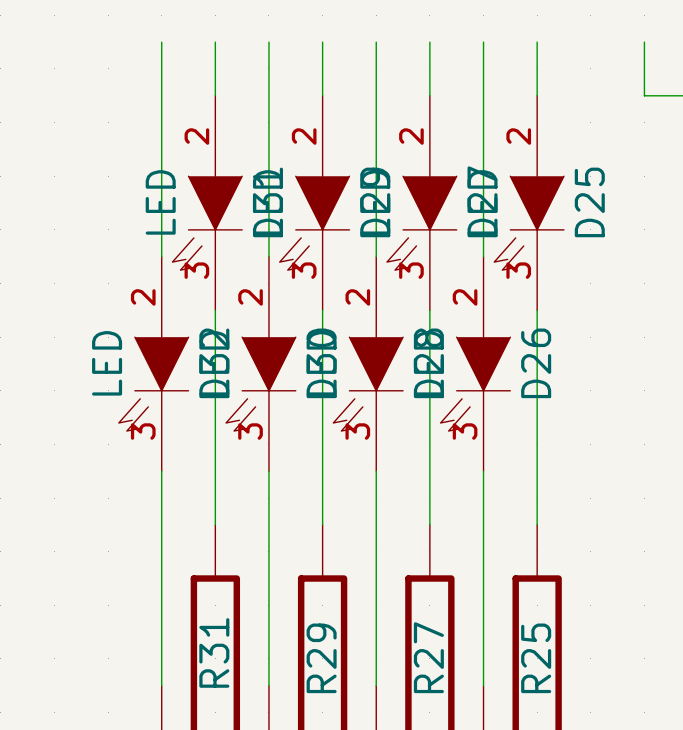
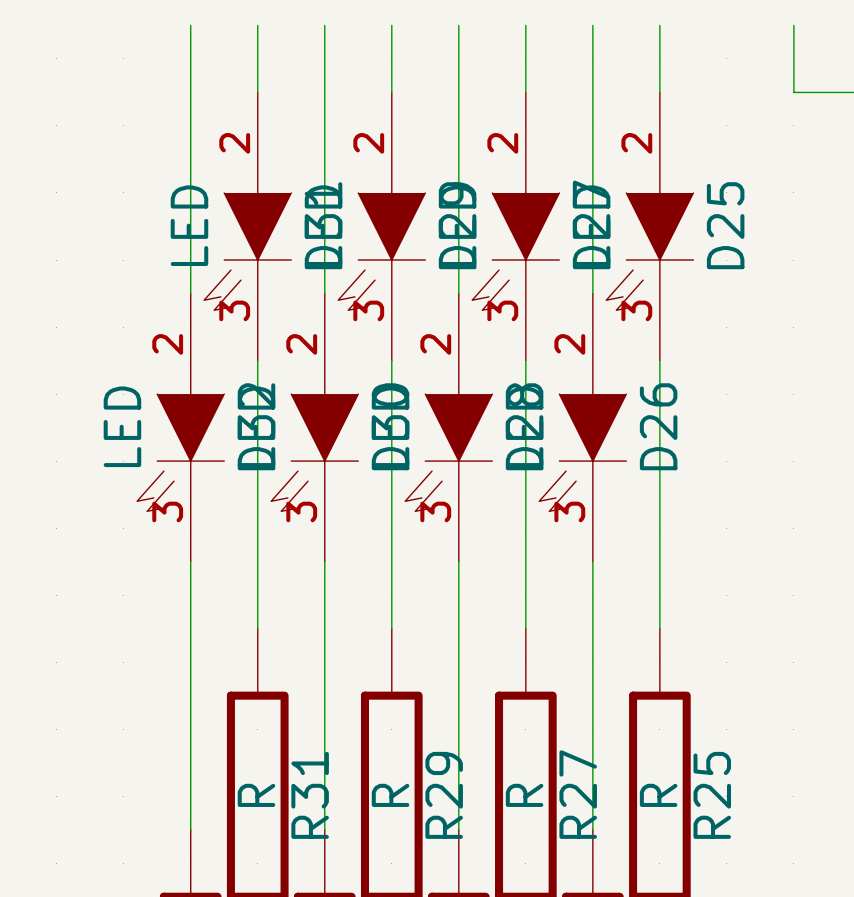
R31 name position: R31 (214, 652) -> R31 (310, 795)
R27 name position: R27 (428, 657) -> R27 (578, 794)
R31 value: none -> R (256, 795)
R29 name position: R29 (321, 658) -> R29 (444, 795)
R29 value: none -> R (390, 795)
R27 value: none -> R (524, 795)
R25 name position: R25 (536, 658) -> R25 (712, 795)
R25 value: none -> R (658, 795)

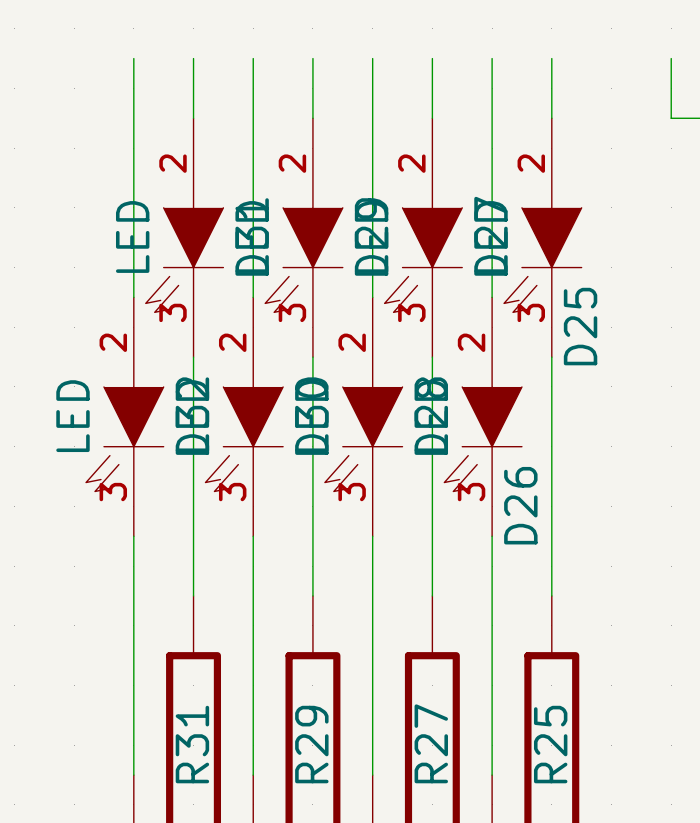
D25 name position: D25 (725, 225) -> D25 (580, 326)
D26 name position: D26 (658, 426) -> D26 (520, 505)
R27 name position: R27 (578, 794) -> R27 (431, 743)
R31 value: R (256, 795) -> none
R31 name position: R31 (310, 795) -> R31 (192, 744)
R29 value: R (390, 795) -> none
R29 name position: R29 (444, 795) -> R29 (311, 744)
R27 value: R (524, 795) -> none
R25 value: R (658, 795) -> none
R25 name position: R25 (712, 795) -> R25 (550, 744)

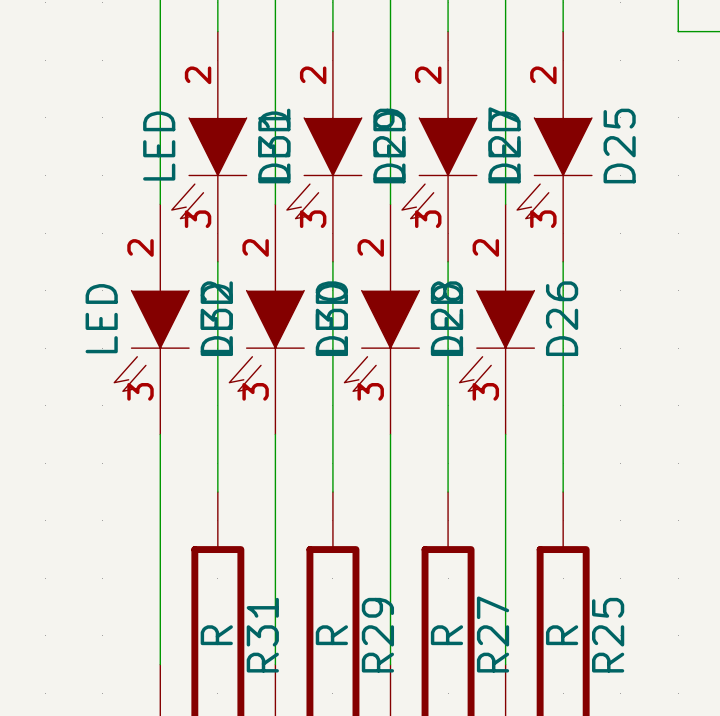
D25 name position: D25 (580, 326) -> D25 (619, 146)
D26 name position: D26 (520, 505) -> D26 (562, 318)
R27 name position: R27 (431, 743) -> R27 (493, 634)
R31 name position: R31 (192, 744) -> R31 (262, 635)
R31 value: none -> R (216, 635)
R29 name position: R29 (311, 744) -> R29 (377, 635)
R29 value: none -> R (331, 635)
R27 value: none -> R (446, 635)
R25 name position: R25 (550, 744) -> R25 (608, 635)
R25 value: none -> R (562, 635)

